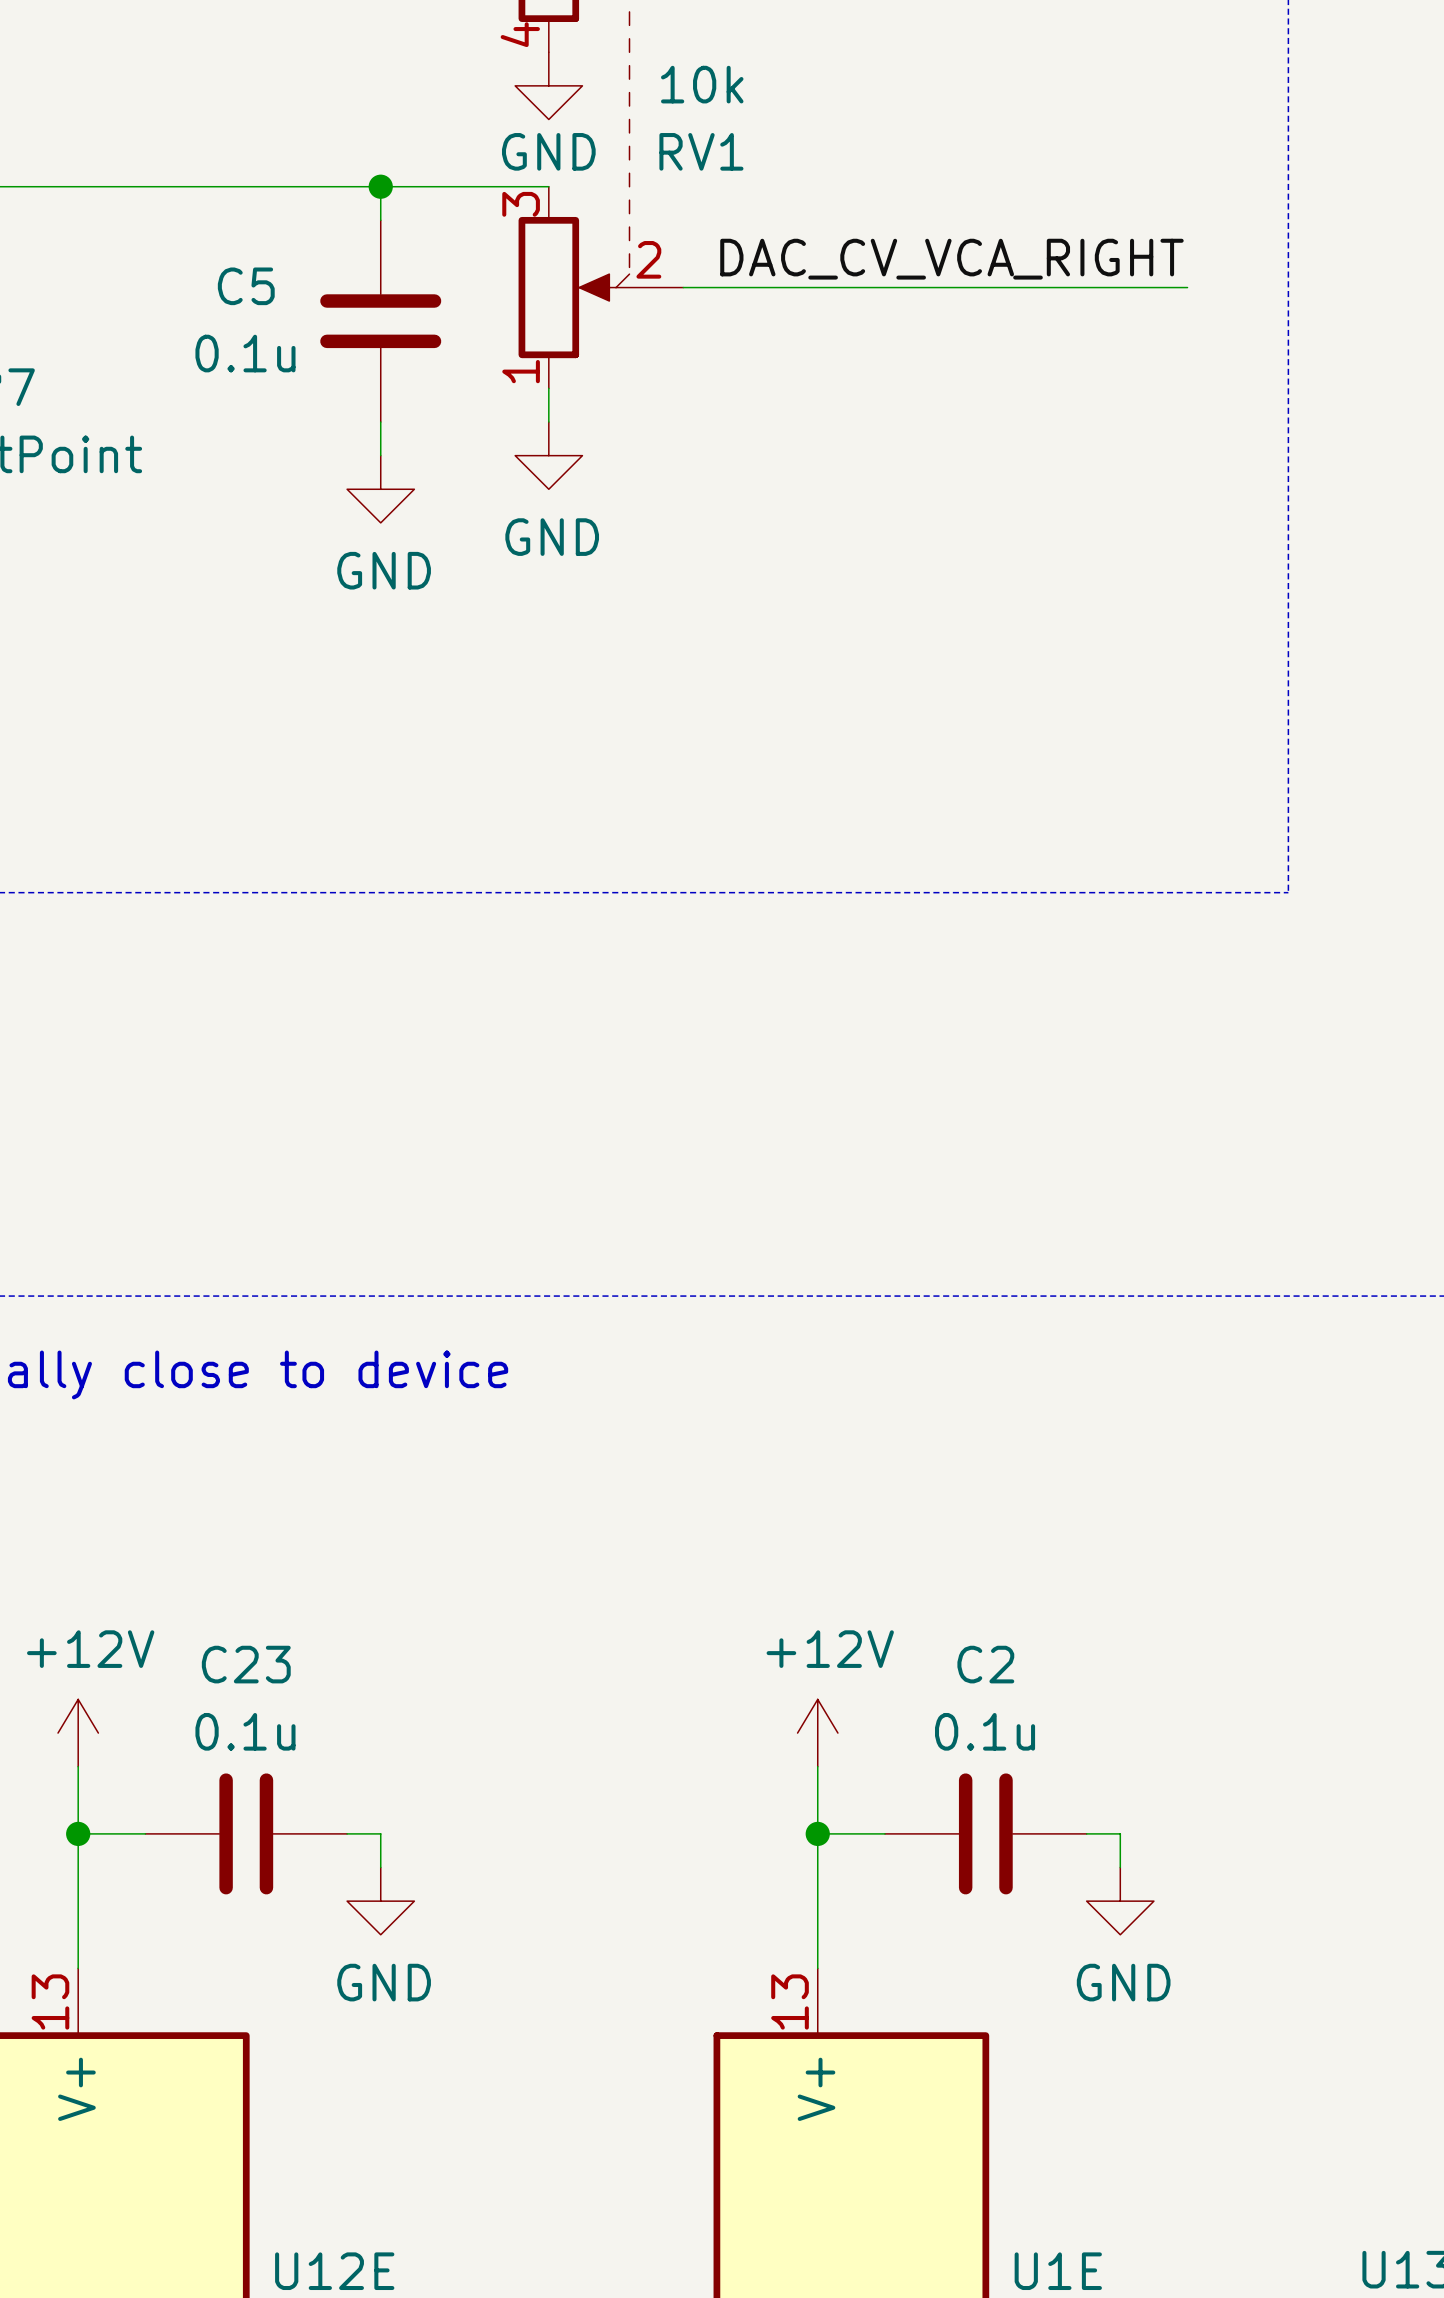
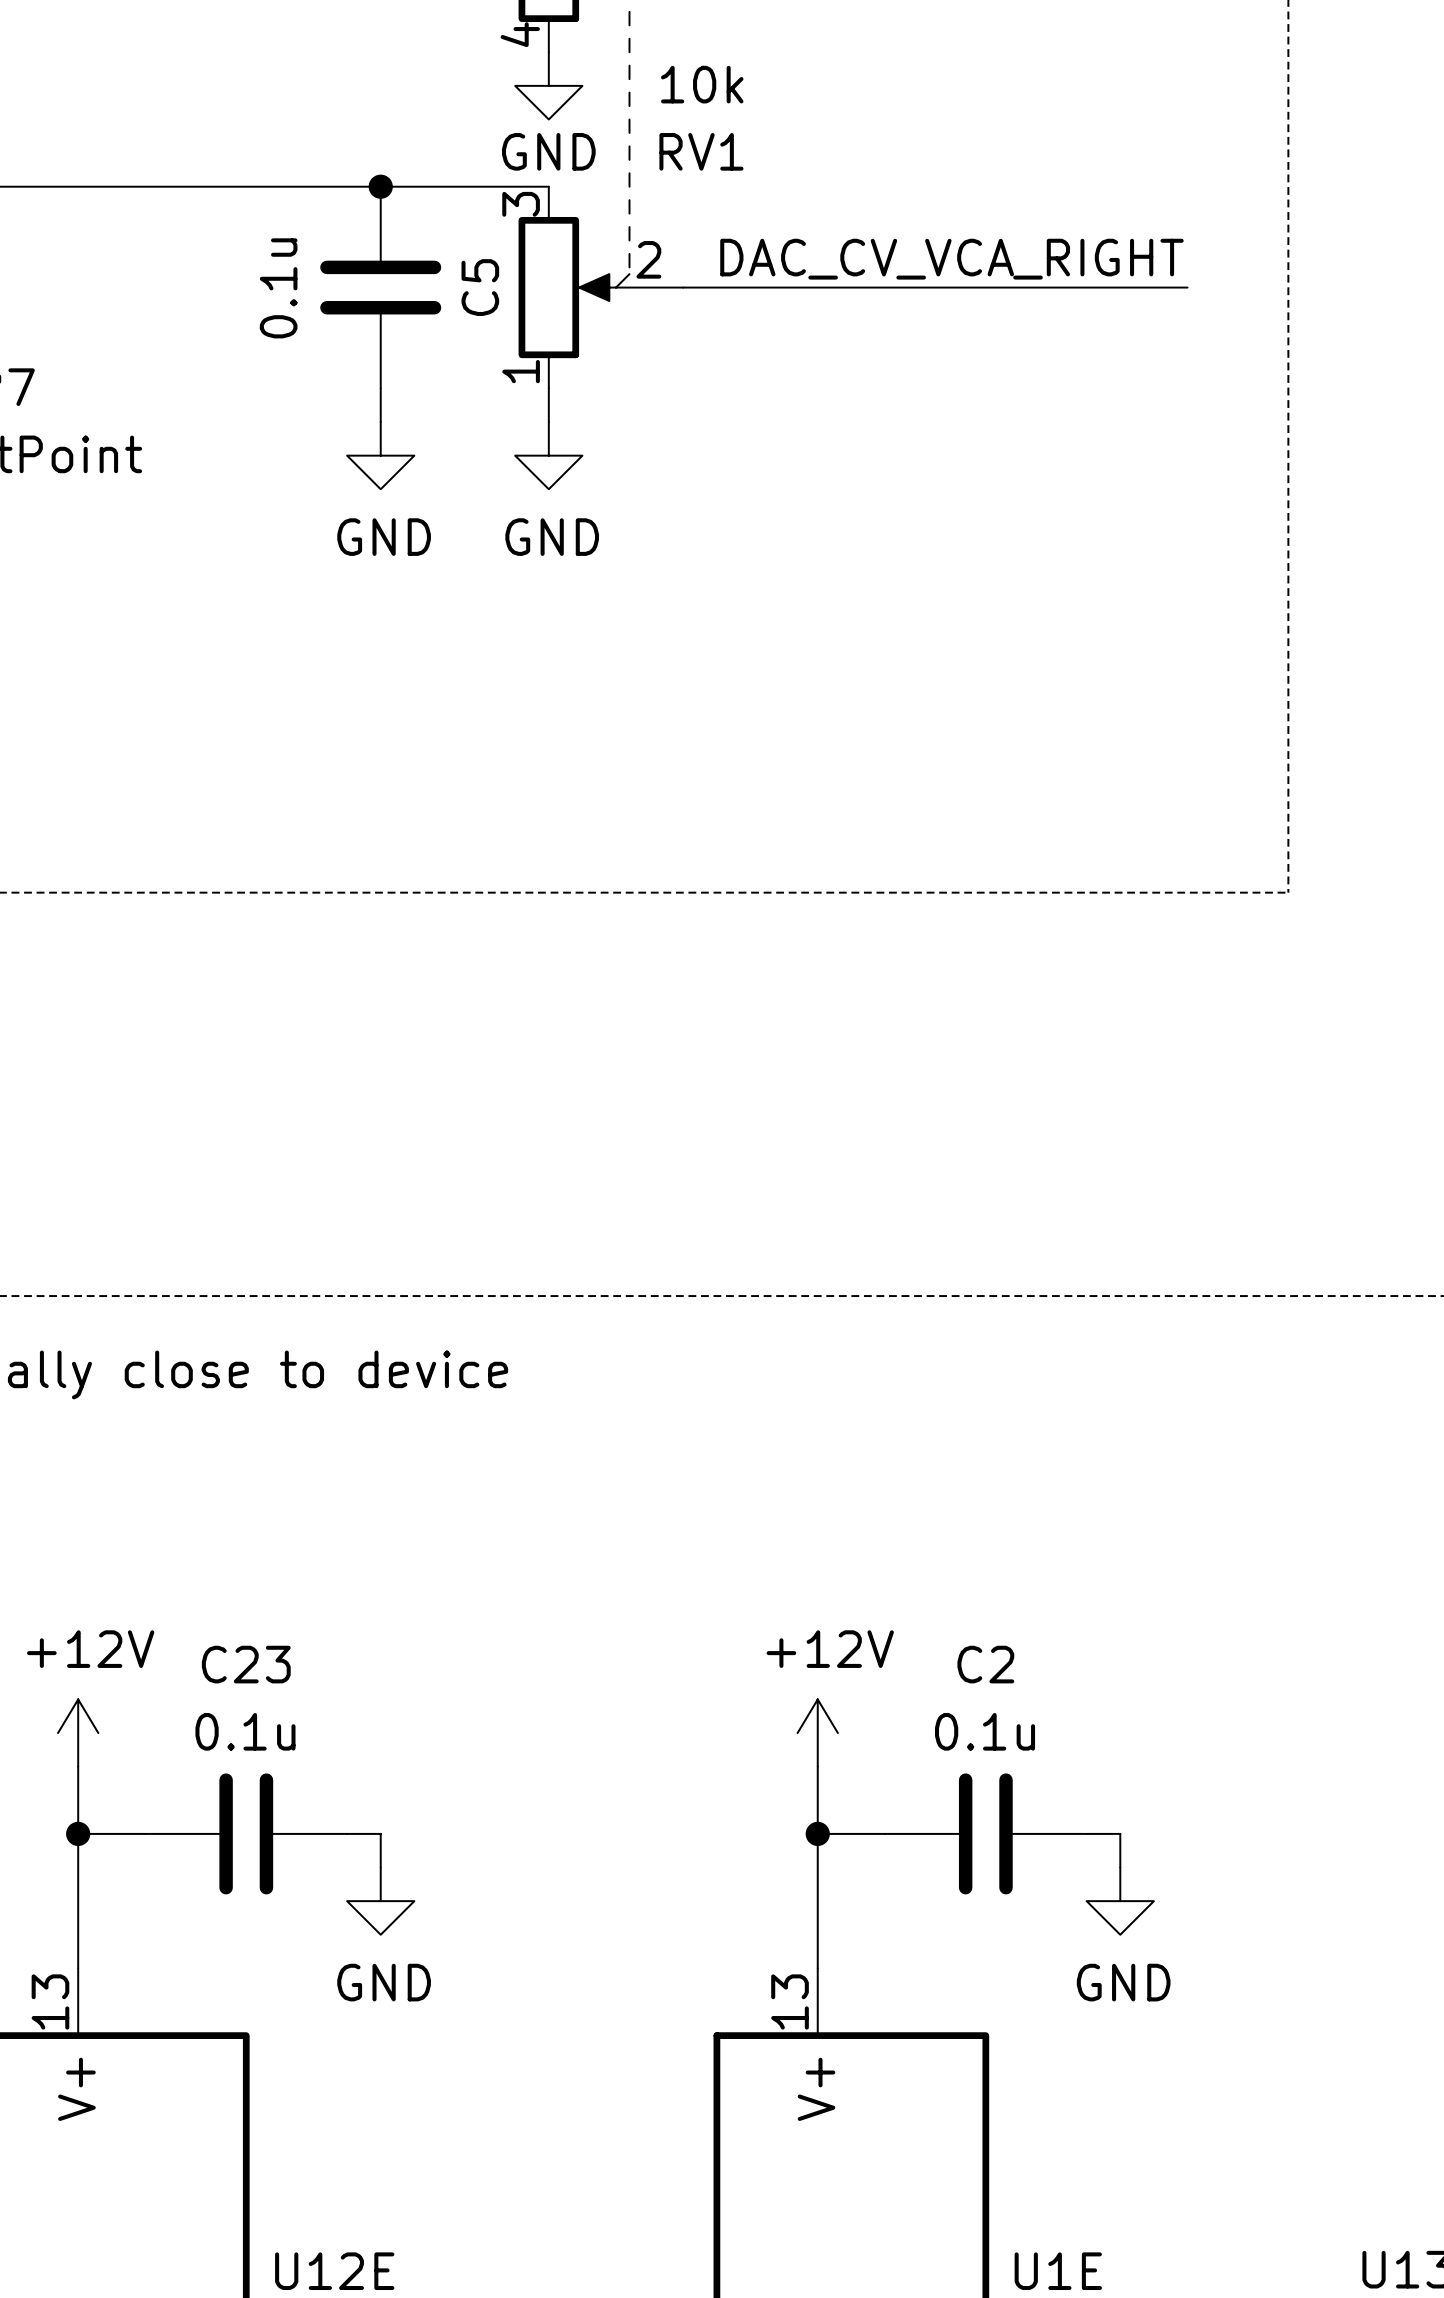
C5 name rotation: 0° (246, 286) -> 90° counterclockwise (480, 287)
C5 name position: C5 (246, 286) -> C5 (480, 287)
C5 position: (380, 321) -> (380, 287)
C5 value rotation: 0° (245, 353) -> 90° counterclockwise (278, 288)
power symbol position: GND (380, 489) -> GND (380, 455)

